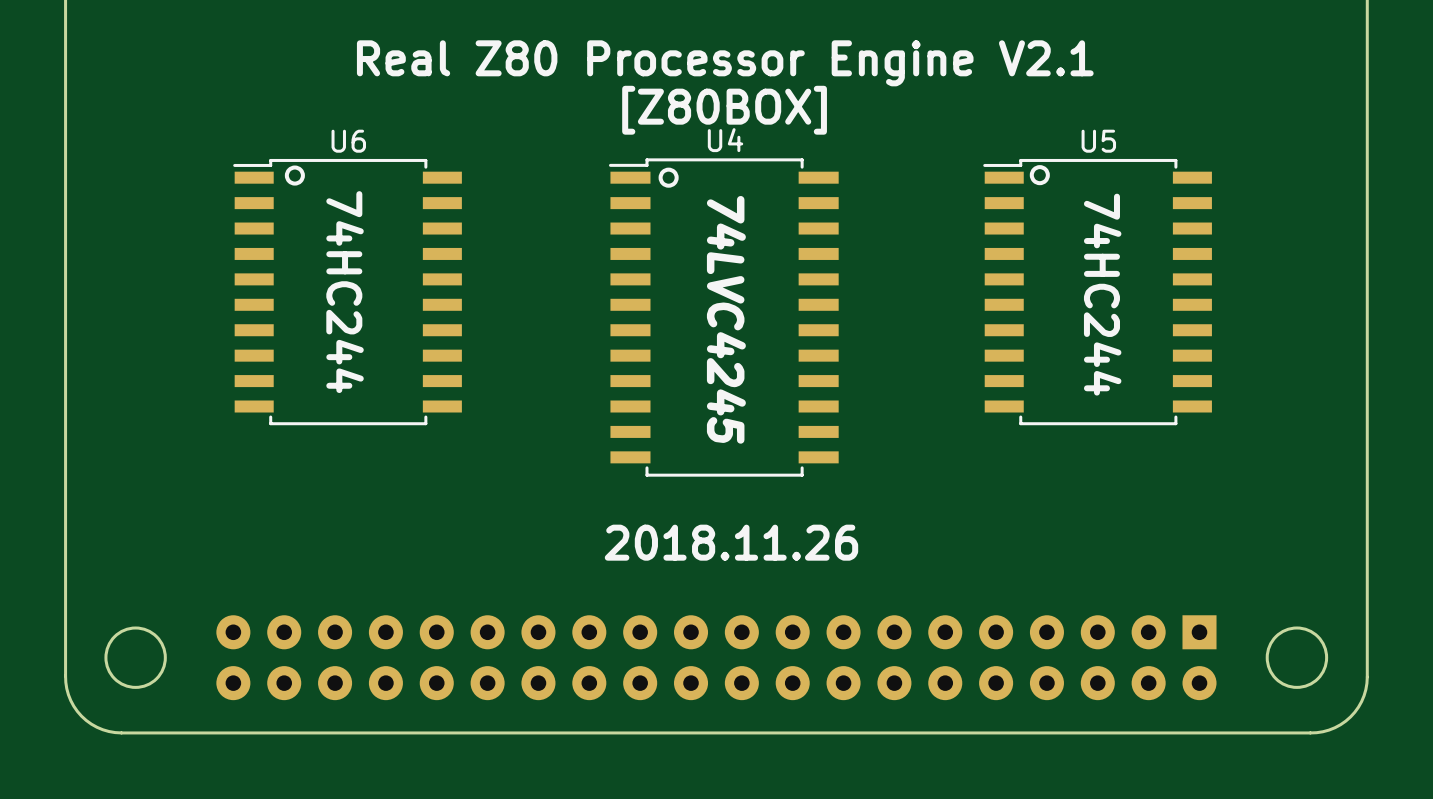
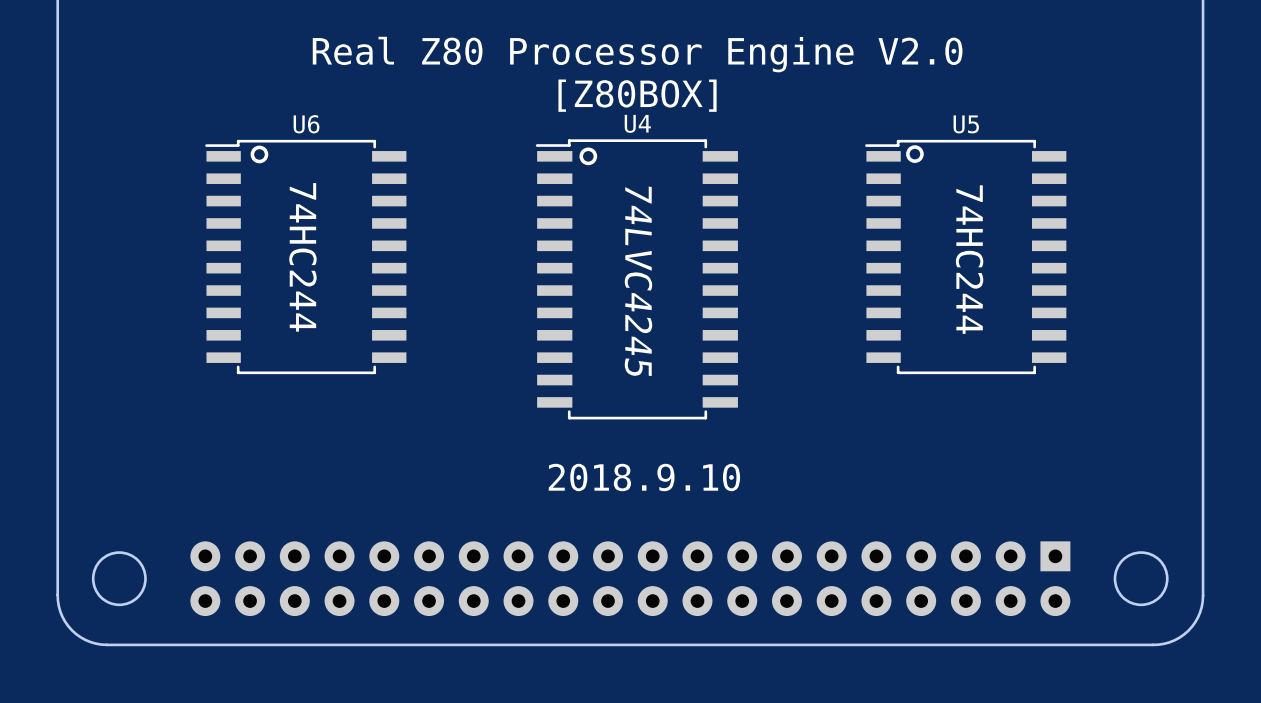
text: Real Z80 Processor Engine V2.1 (725, 63) -> Real Z80 Processor Engine V2.0 (637, 54)
text: 2018.11.26 (731, 542) -> 2018.9.10 (644, 477)

